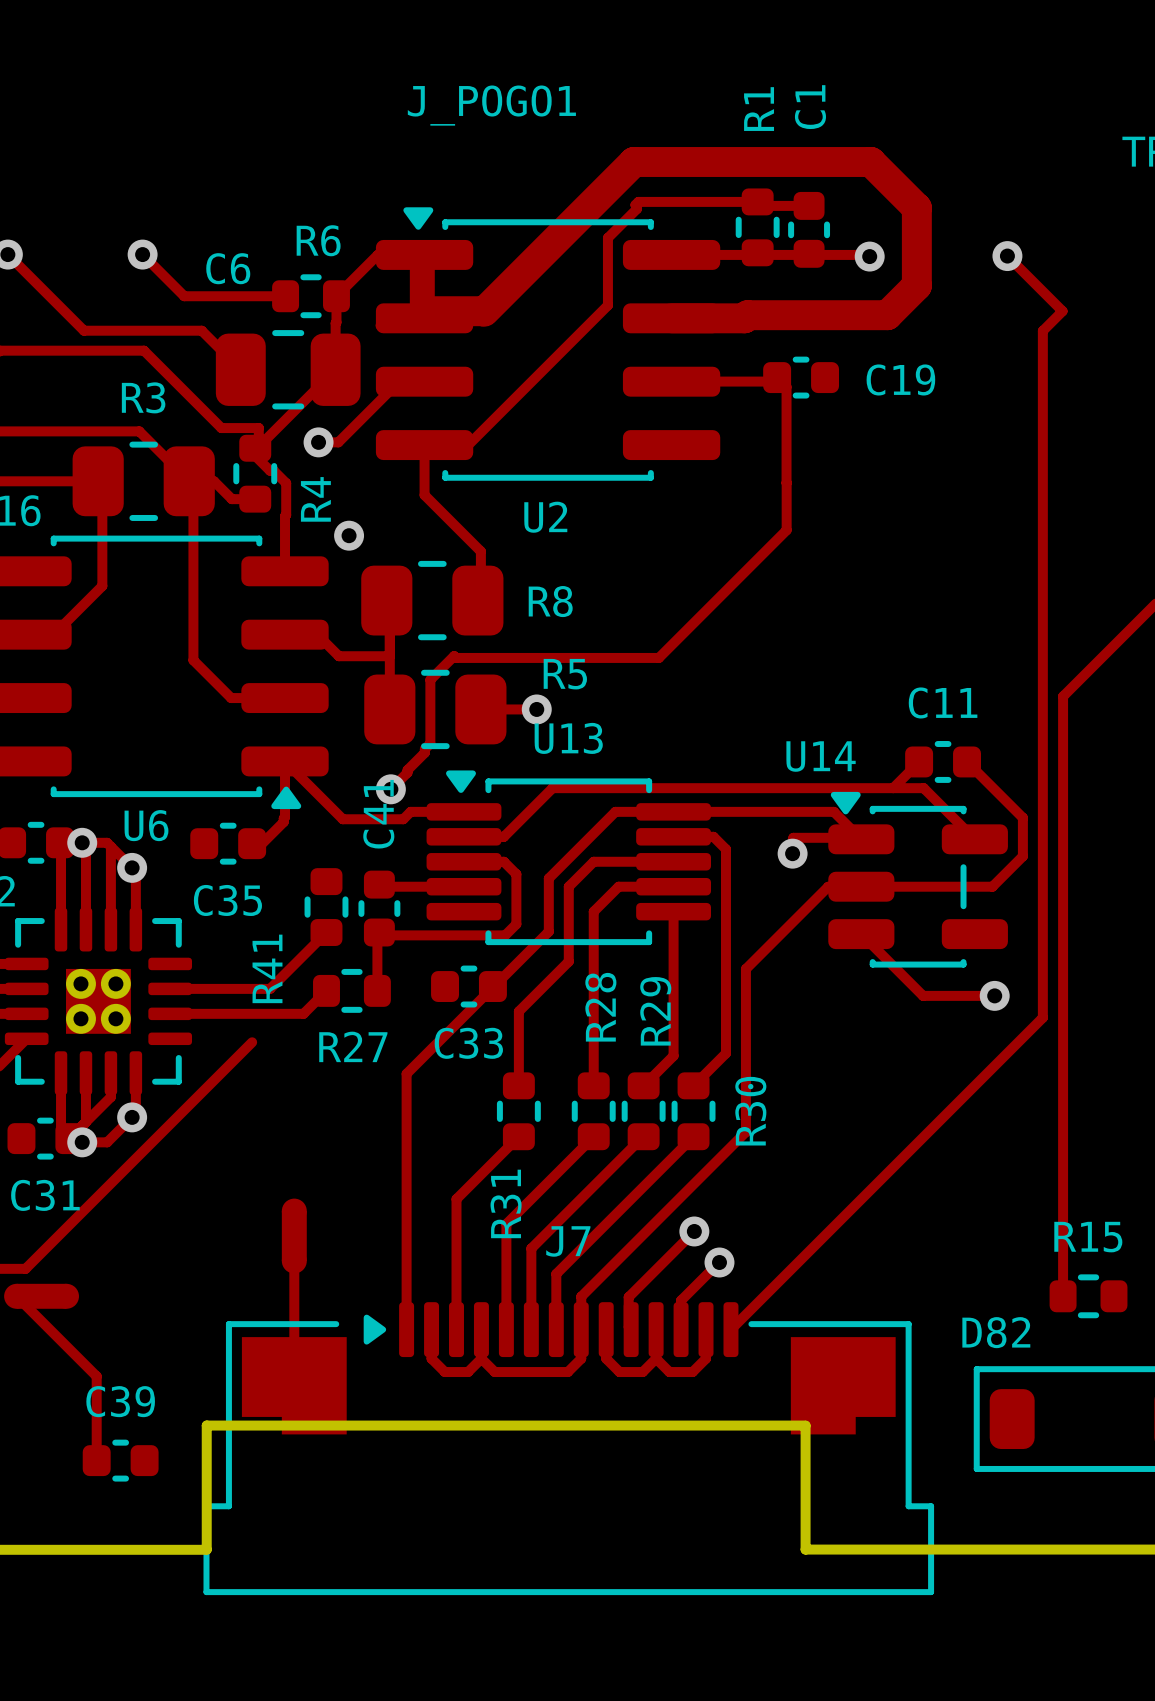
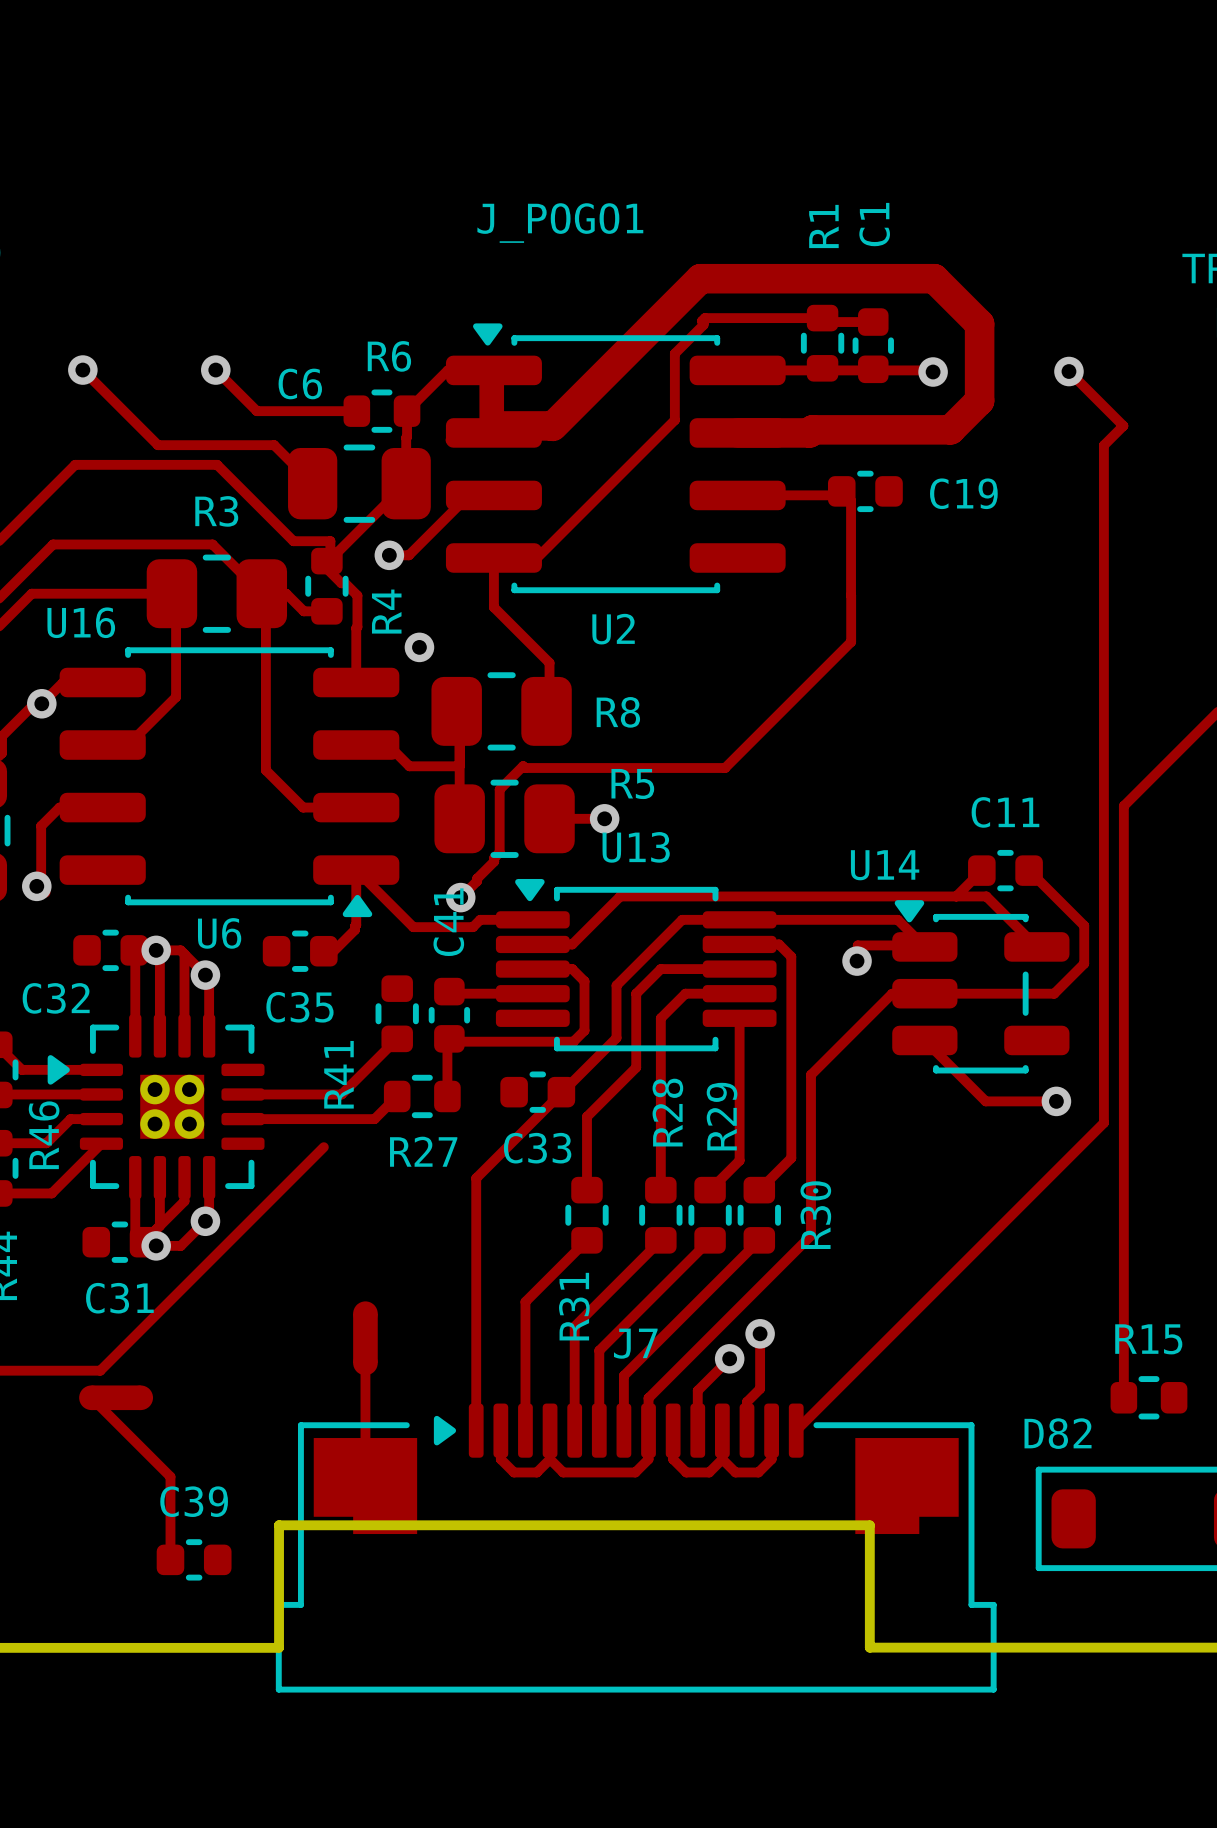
track: (694, 1231) (628, 1297) (628, 1327) (631, 1329) -> (729, 1358) (697, 1390) (697, 1430)
track: (719, 1262) (694, 1287) -> (760, 1333) (760, 1388)
via position: (719, 1262) -> (729, 1358)

